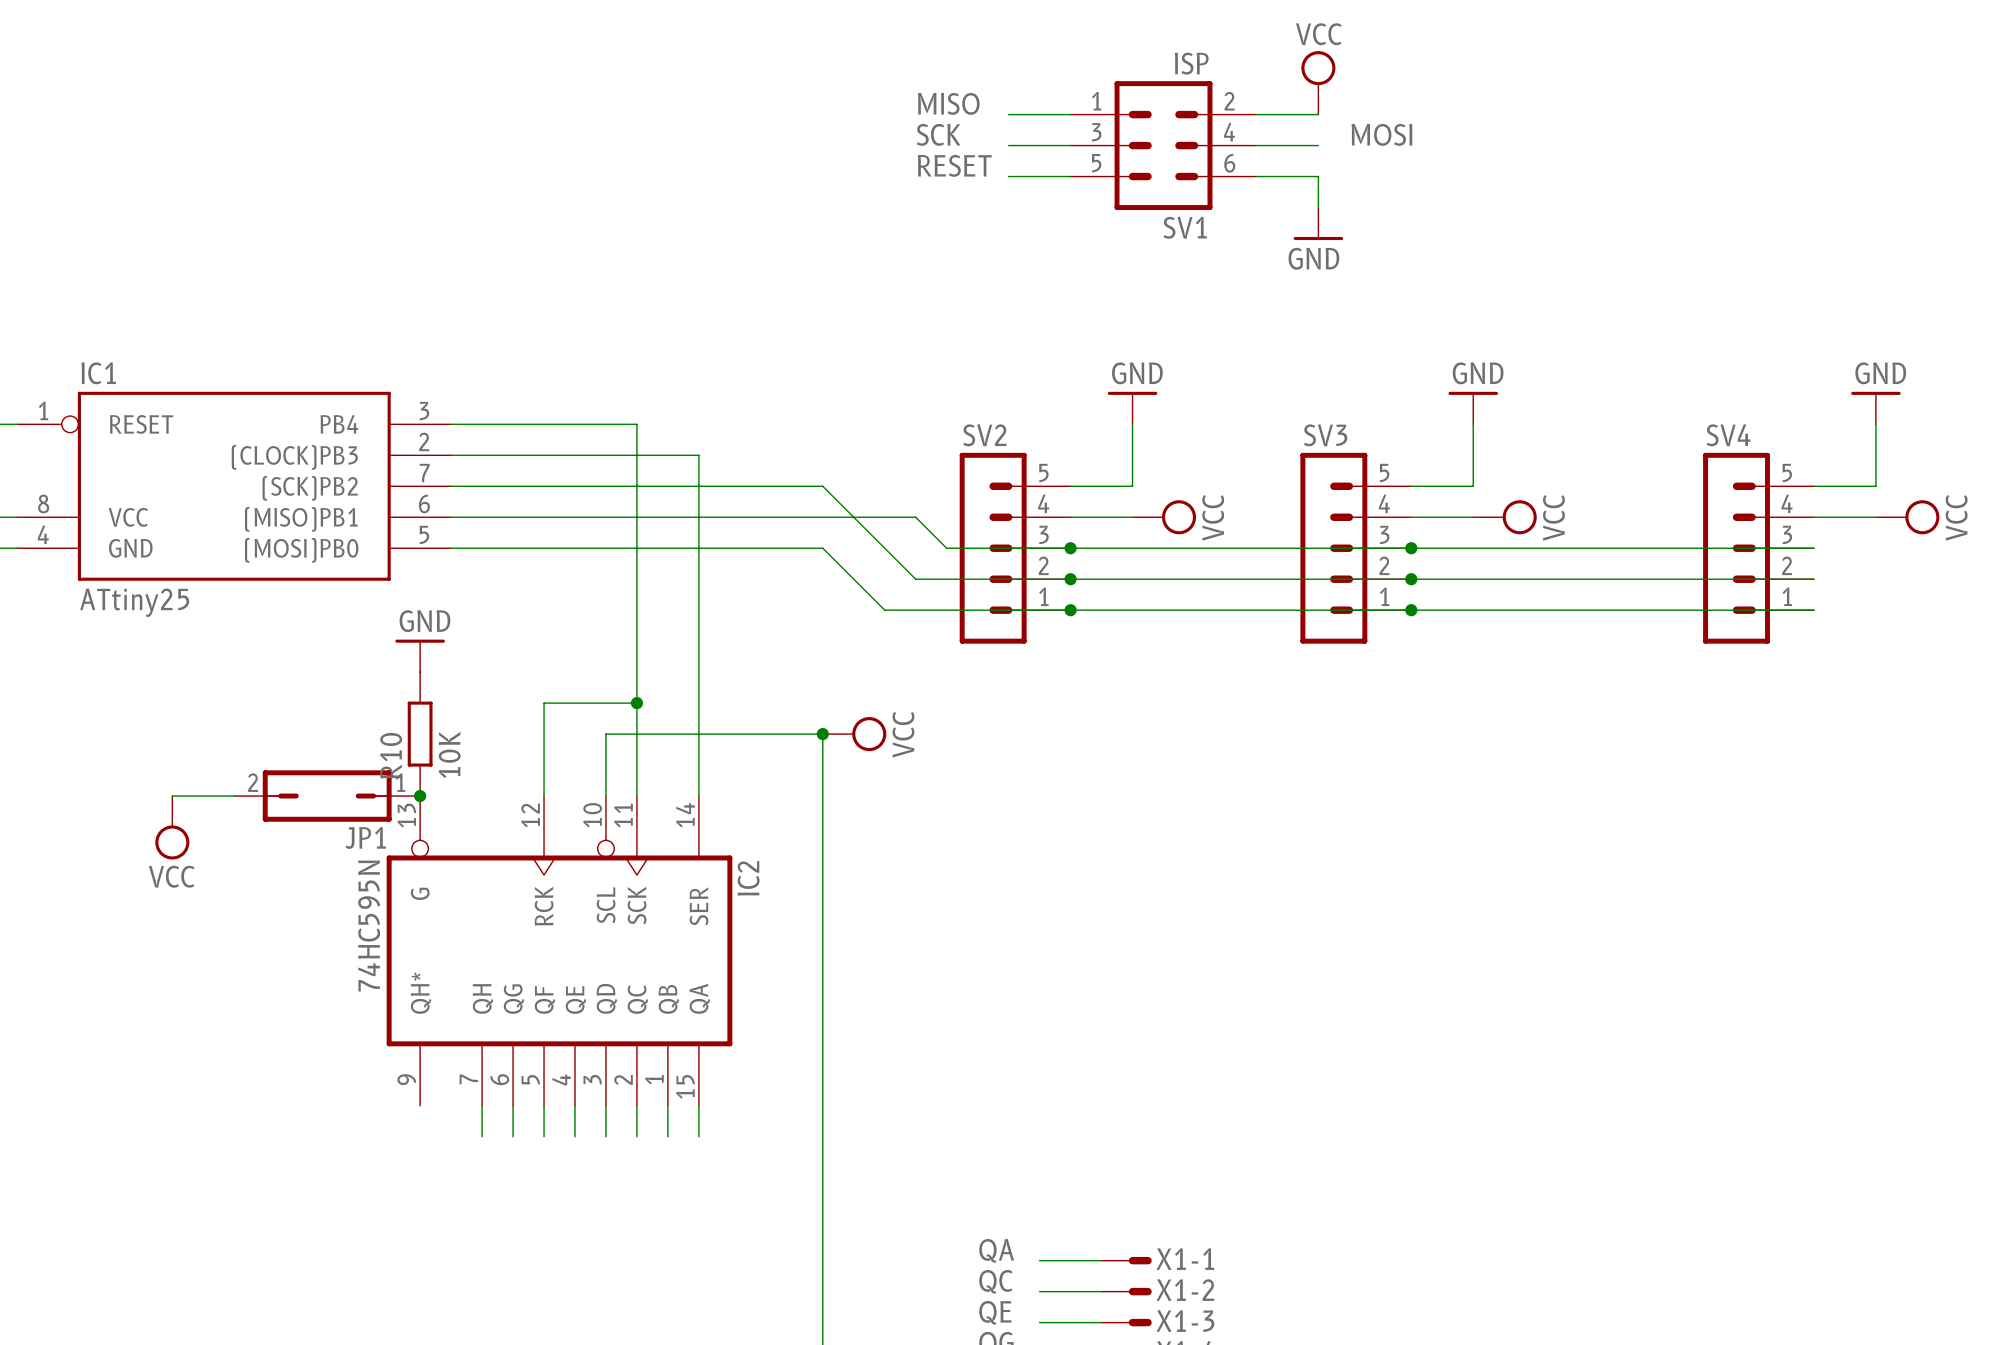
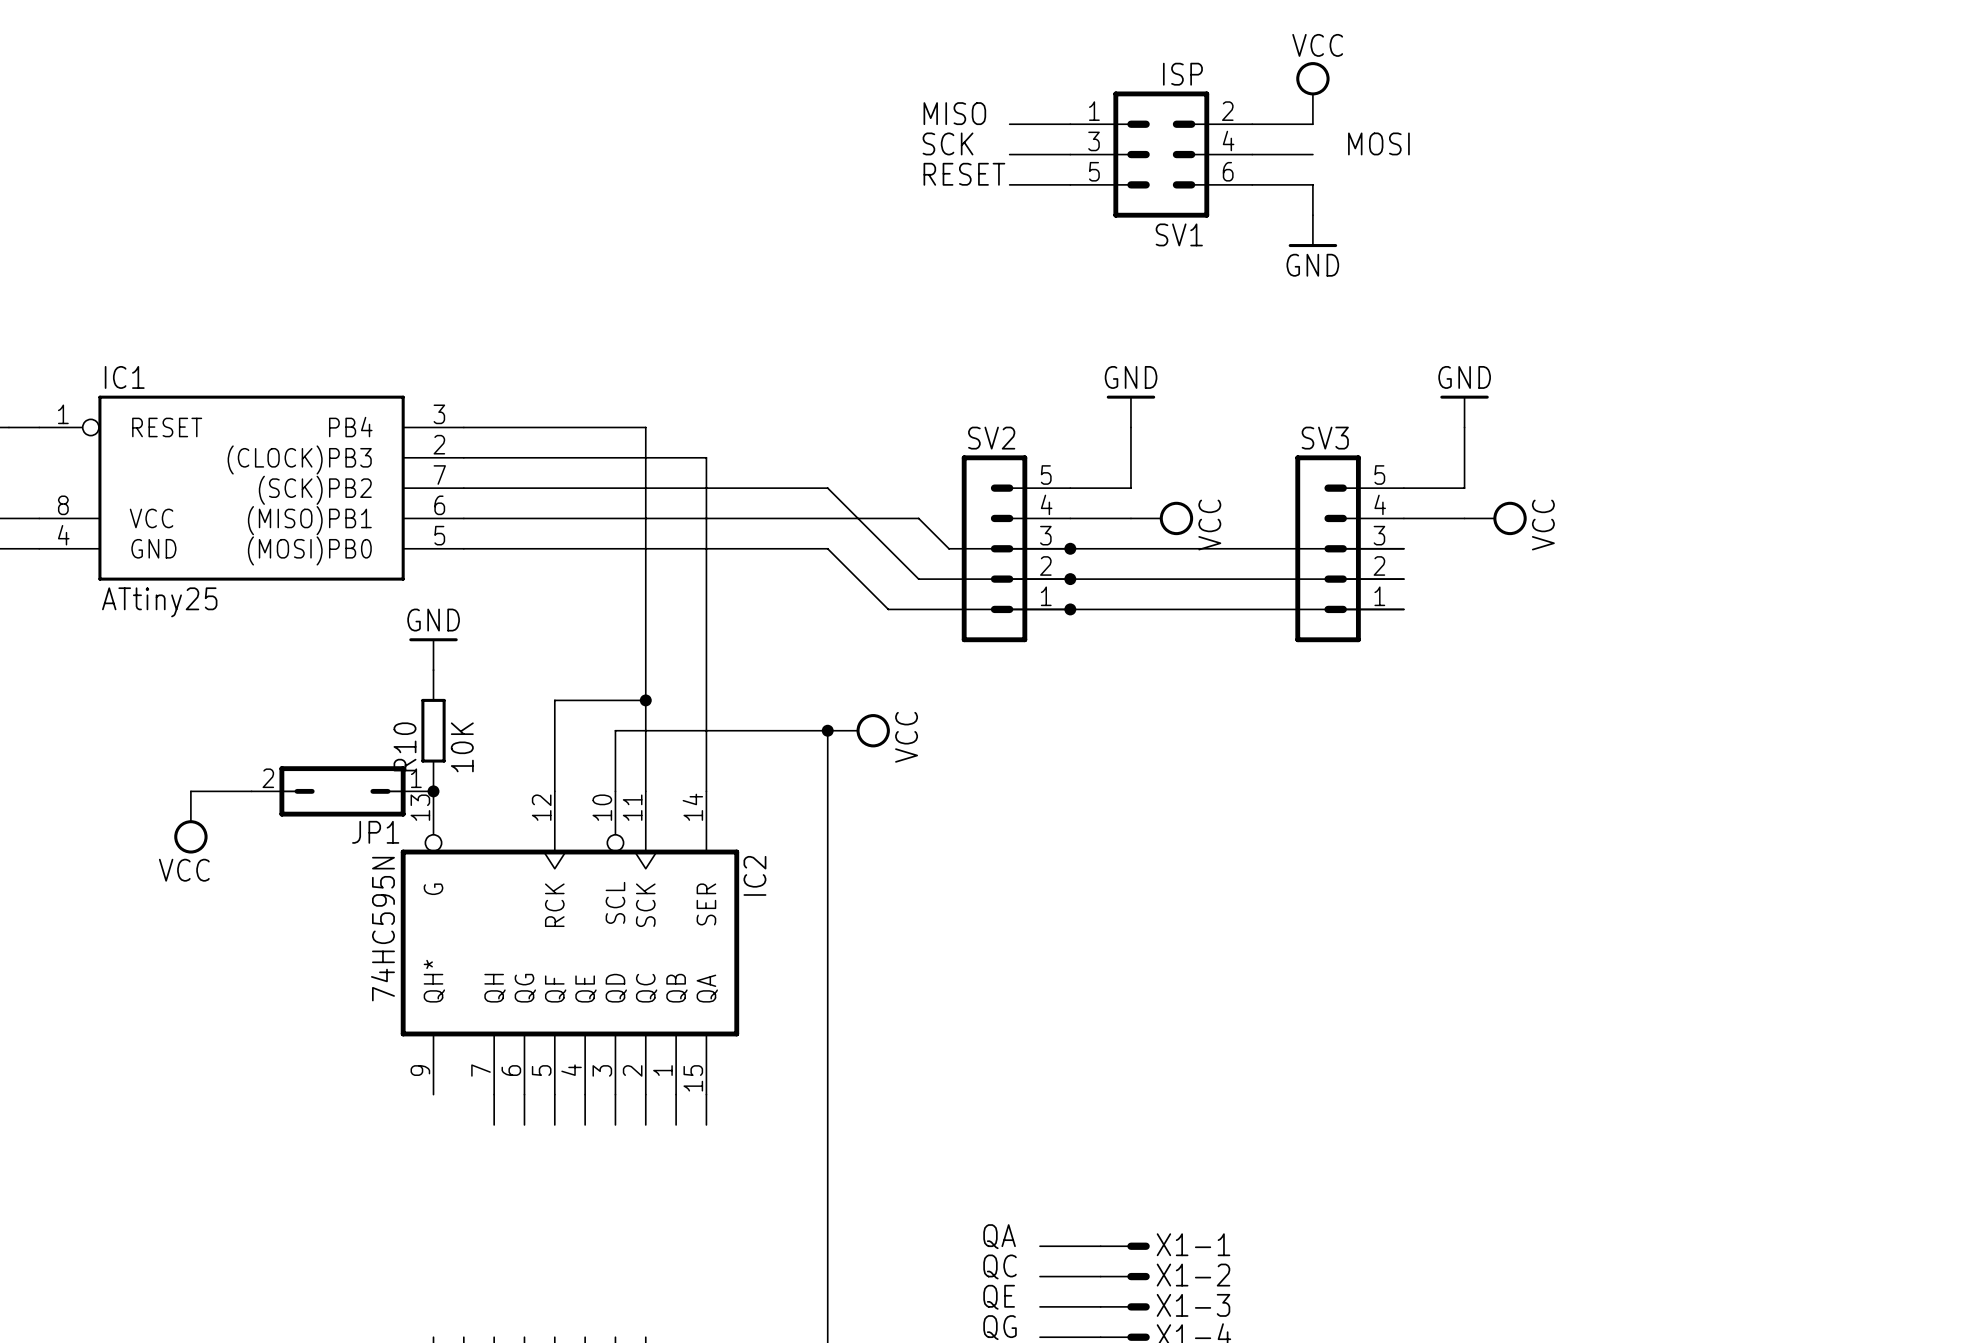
power symbol: GND (1875, 408) -> none
wire: (1875, 424) (1875, 486) (1813, 486) -> none
wire: (1813, 517) (1875, 517) -> none
power symbol: VCC (1907, 517) -> none
wire: (1411, 548) (1813, 548) -> none
junction: (1411, 548) -> none
SV4: (1758, 548) -> none
wire: (1411, 579) (1813, 579) -> none
junction: (1411, 579) -> none
wire: (1411, 610) (1813, 610) -> none
junction: (1411, 610) -> none

